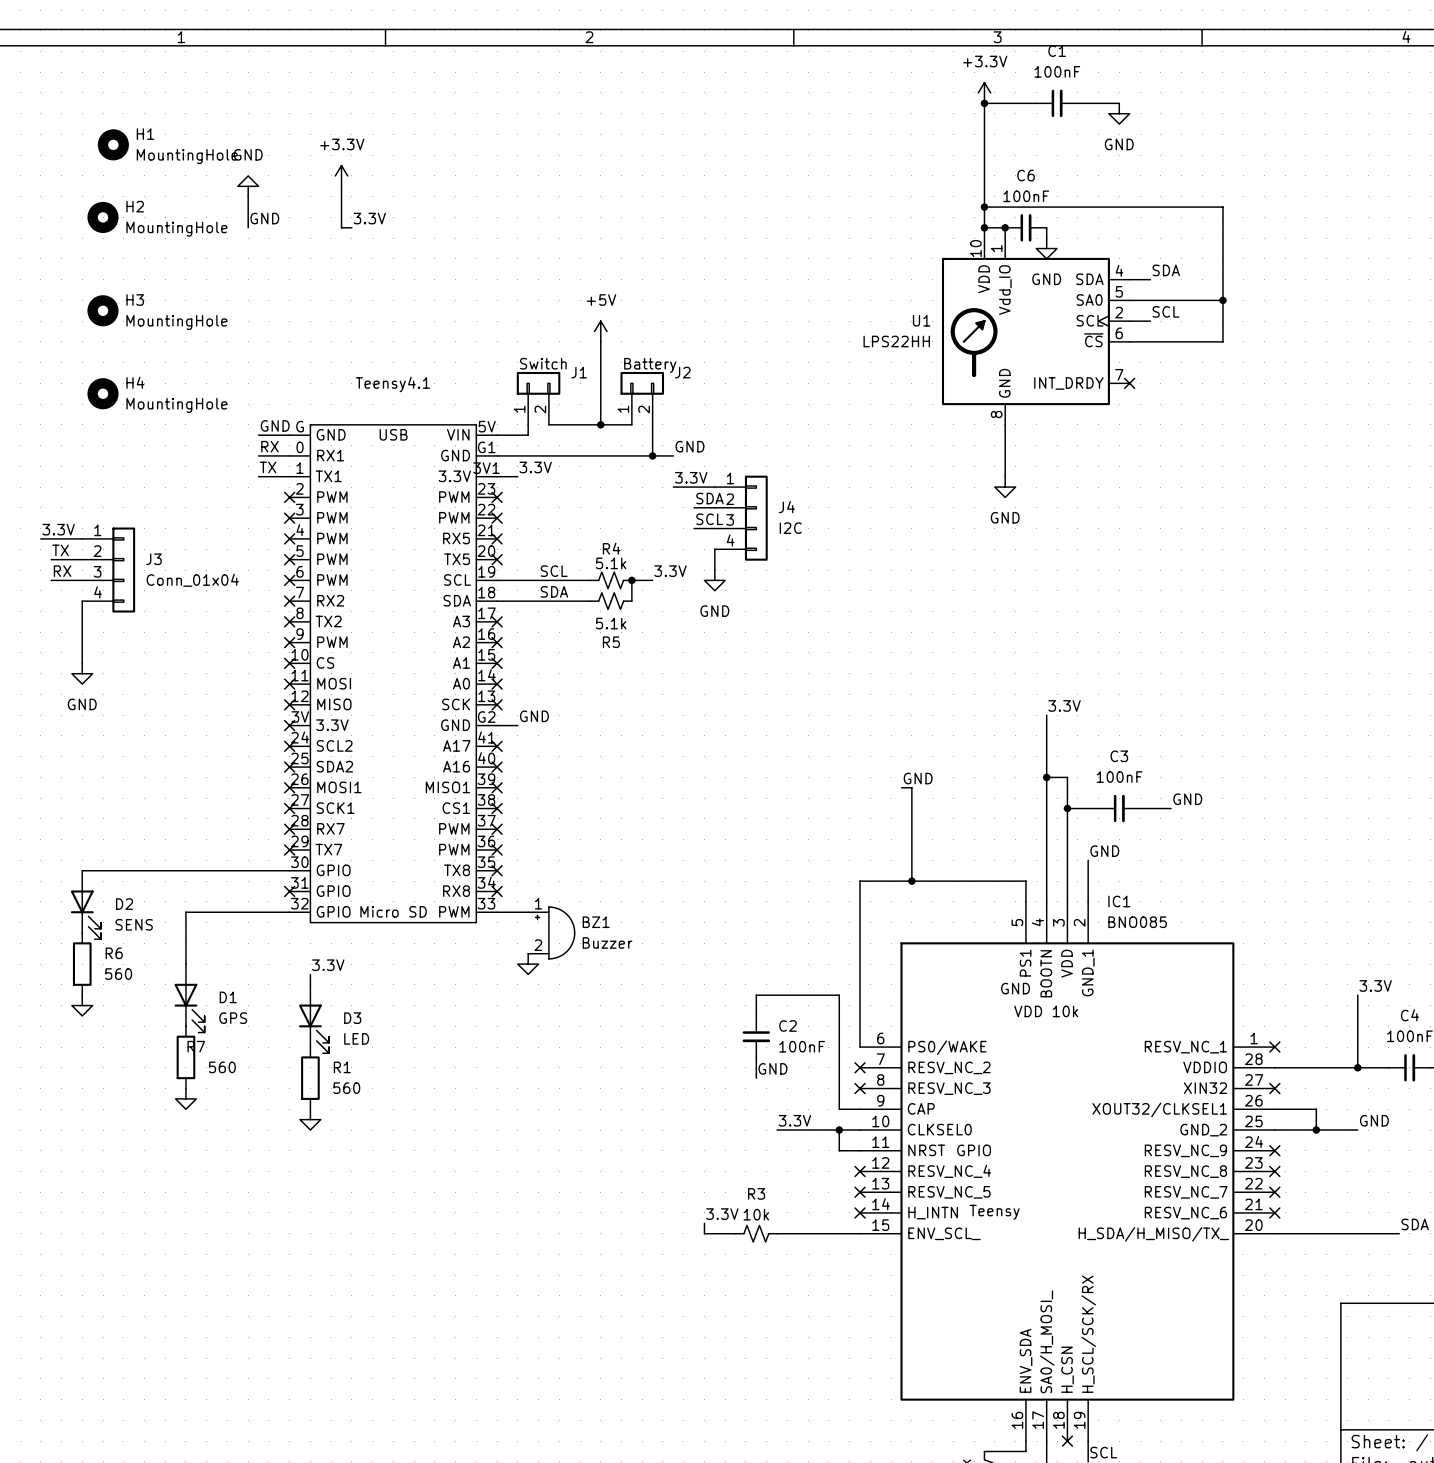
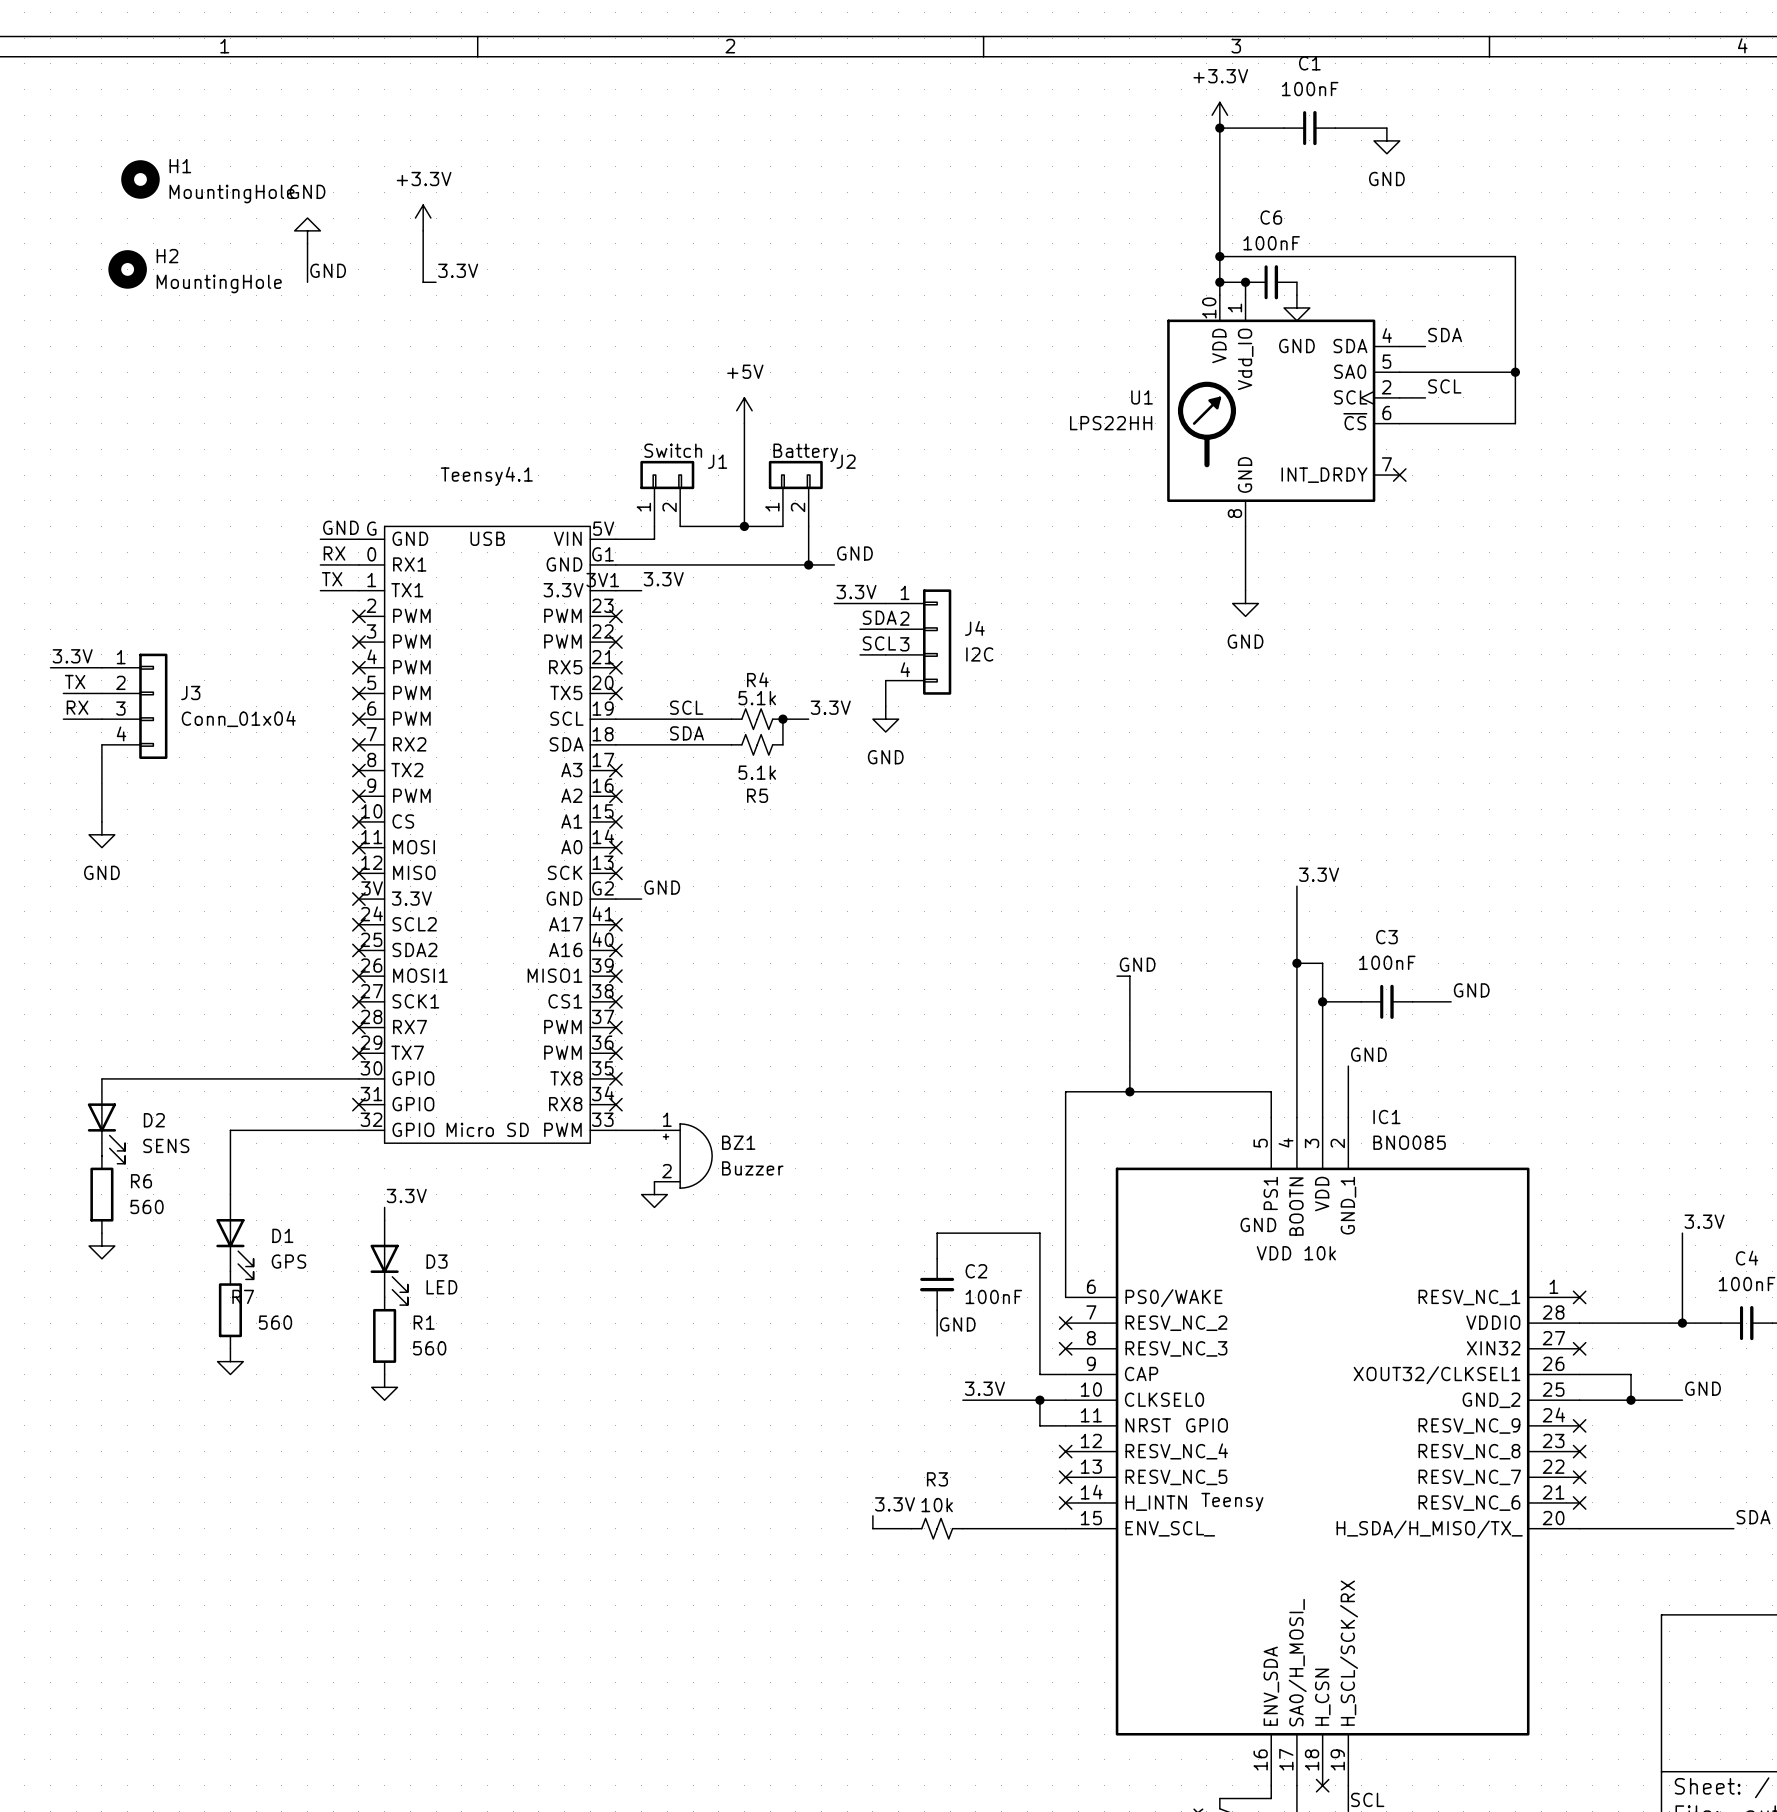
H3: MountingHole (103, 310) -> none
H4: MountingHole (103, 393) -> none

